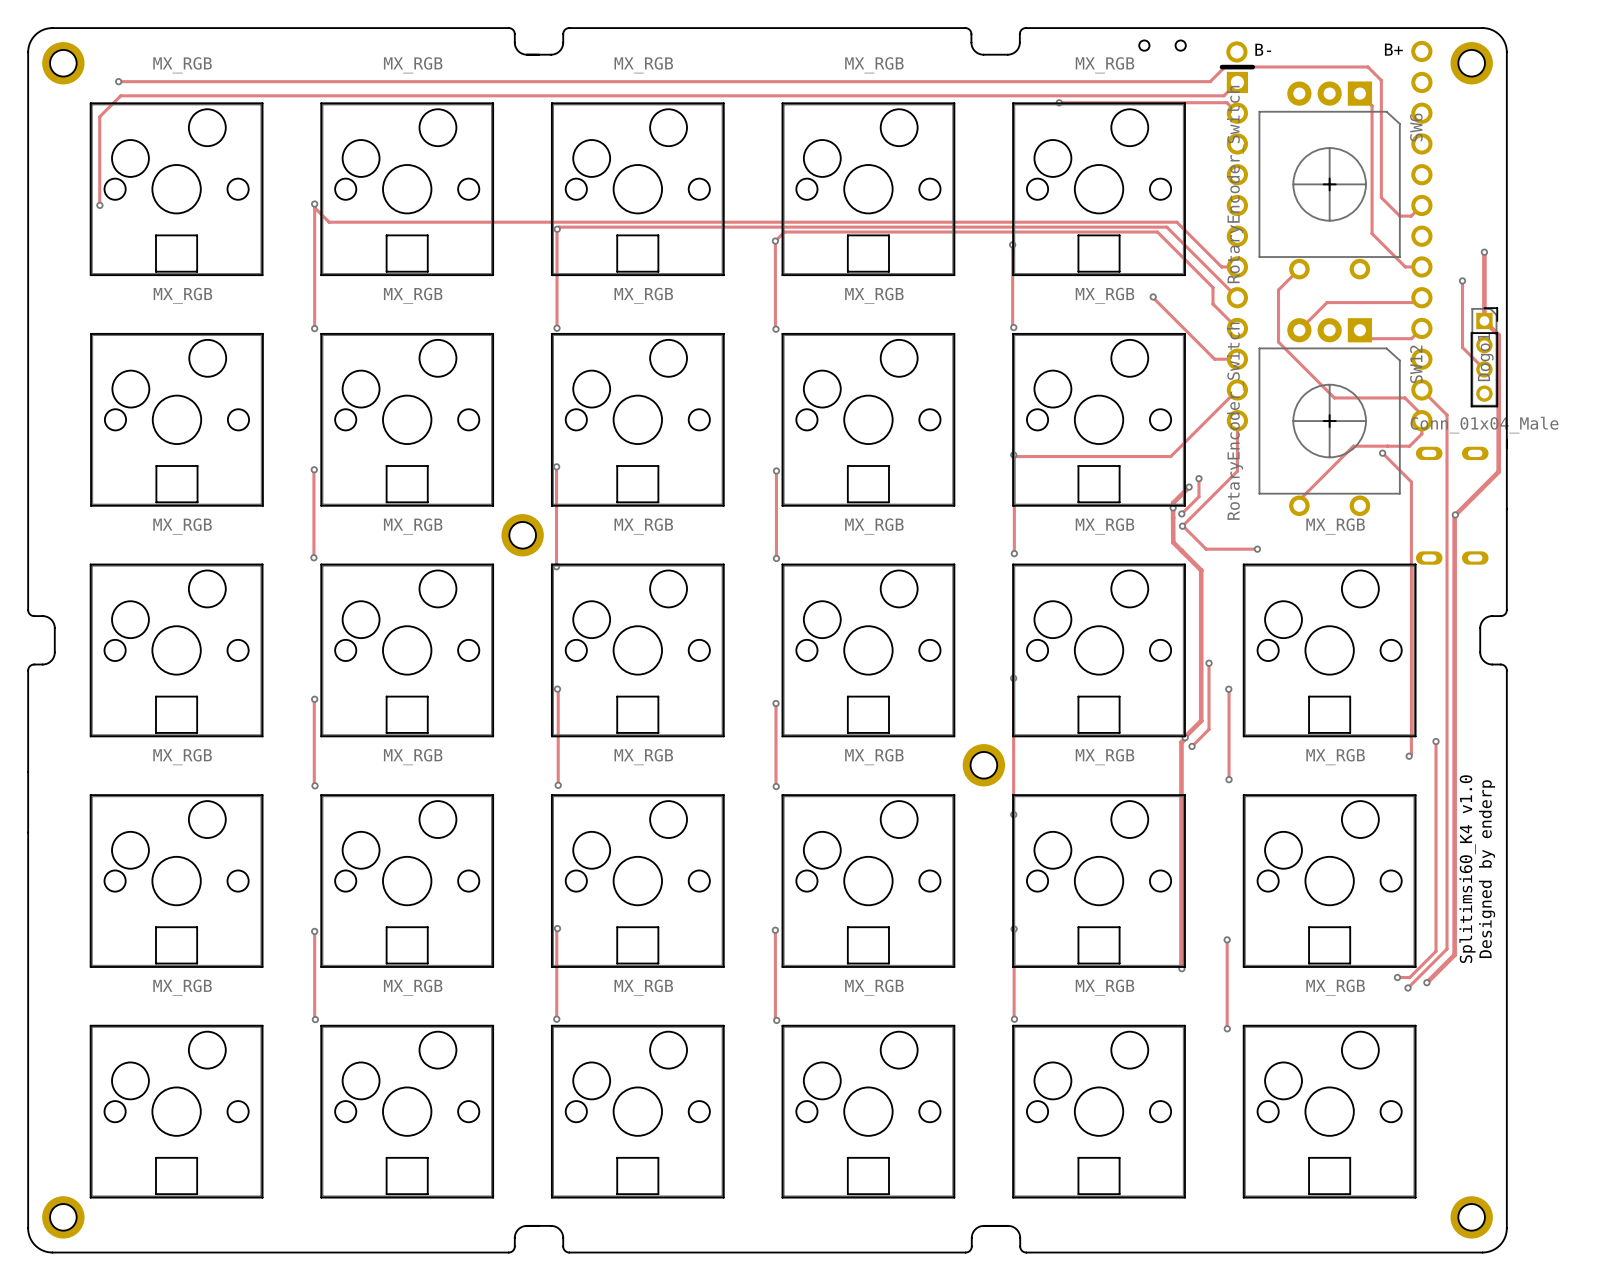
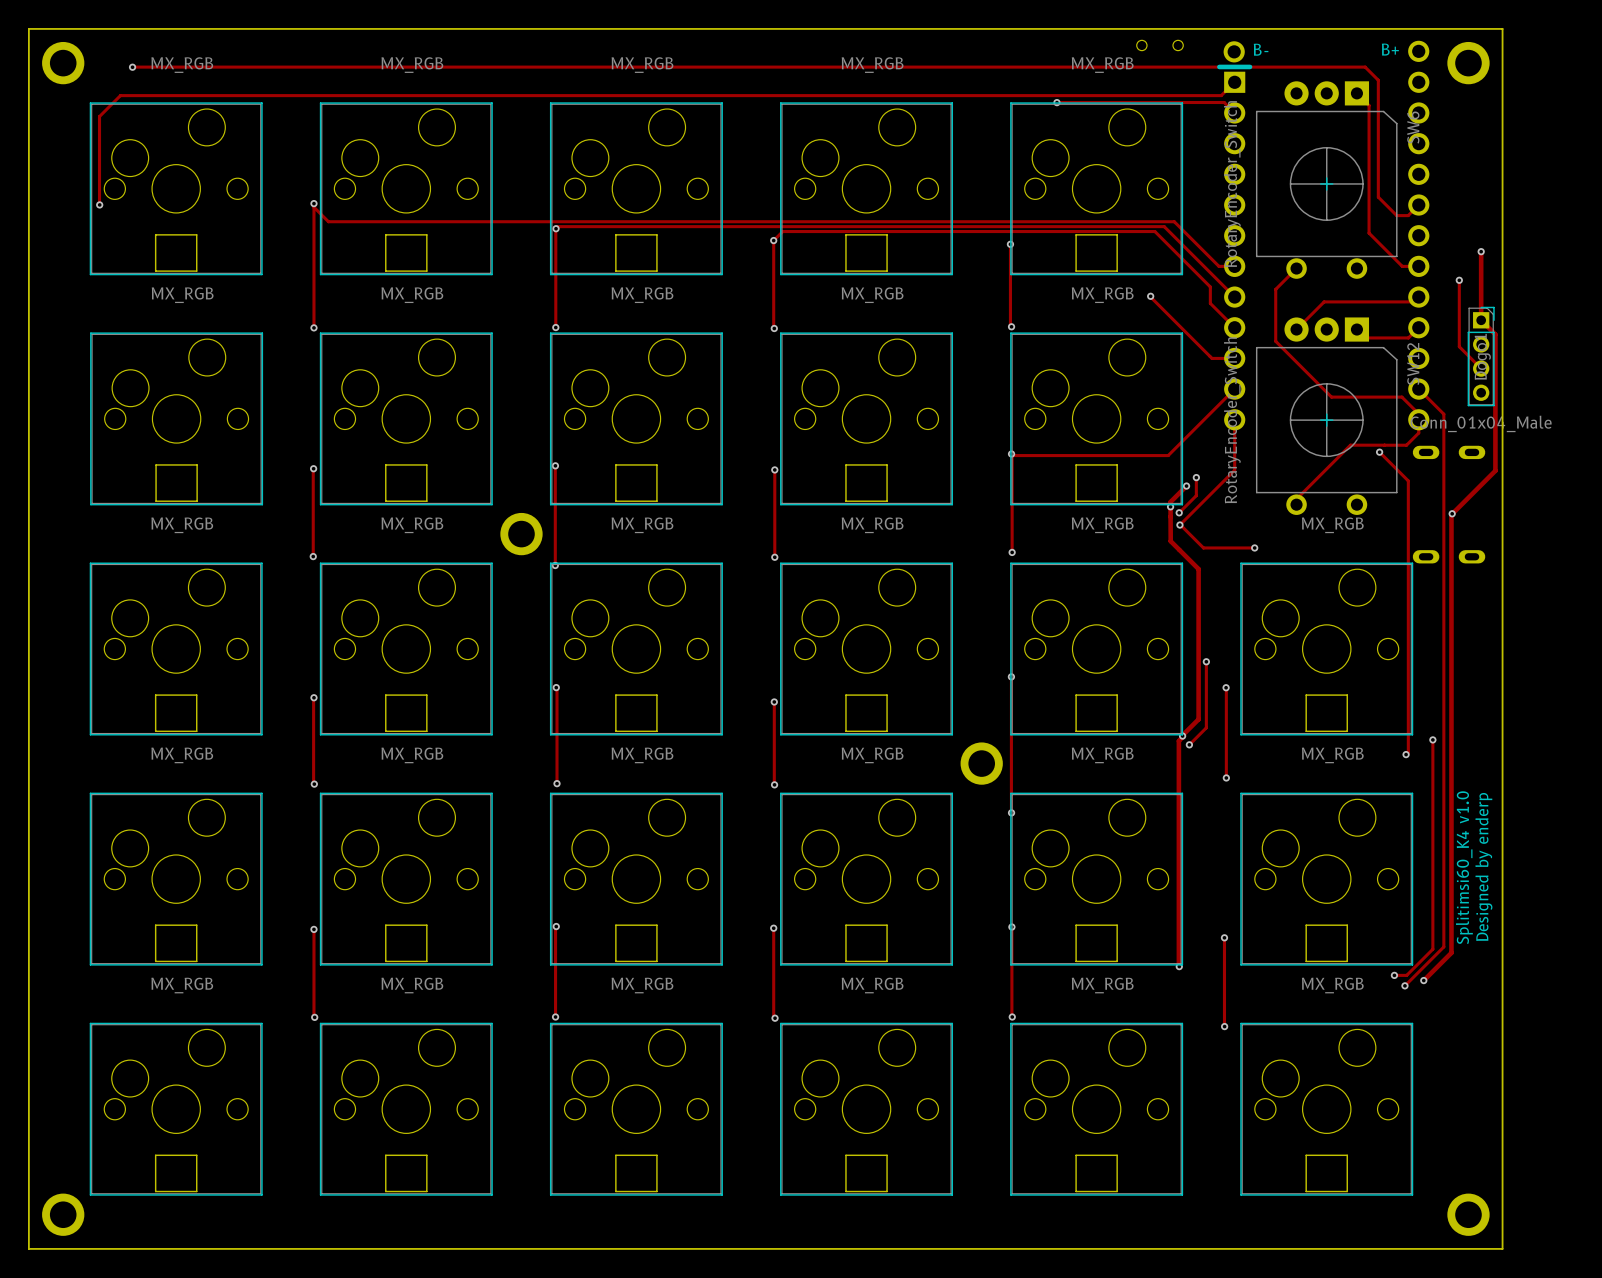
board edge: (52, 28) (508, 28) (514, 31) (516, 49) (526, 54) (557, 52) (562, 46) (563, 31) (569, 28) (965, 28) (970, 31) (973, 49) (983, 54) (1014, 52) (1019, 46) (1020, 31) (1025, 28) (1482, 28) (1497, 33) (1504, 41) (1506, 52) (1506, 610) (1503, 615) (1488, 616) (1482, 621) (1480, 652) (1485, 662) (1503, 664) (1506, 670) (1506, 1228) (1501, 1243) (1493, 1250) (1482, 1252) (1026, 1252) (1020, 1248) (1019, 1234) (1014, 1227) (983, 1225) (973, 1231) (971, 1248) (965, 1252) (569, 1252) (563, 1248) (562, 1234) (557, 1227) (526, 1225) (516, 1231) (514, 1248) (508, 1252) (52, 1252) (37, 1247) (30, 1238) (28, 1228) (28, 670) (31, 664) (46, 663) (52, 658) (54, 628) (49, 617) (31, 615) (28, 610) (28, 52) (30, 41) (35, 35) (44, 29) (52, 28) -> (28, 28) (28, 1248) (1502, 1248) (1502, 28) (28, 28)
round board edge: [50, 49, 77, 77] -> none
round board edge: [1458, 49, 1485, 77] -> none
track: (1368, 67) (1224, 67) (1210, 81) (118, 81) -> (1365, 67) (132, 67)
via position: (118, 81) -> (132, 67)
round board edge: [509, 521, 536, 549] -> none
round board edge: [970, 751, 998, 779] -> none
round board edge: [50, 1204, 77, 1231] -> none
round board edge: [1458, 1204, 1485, 1231] -> none

